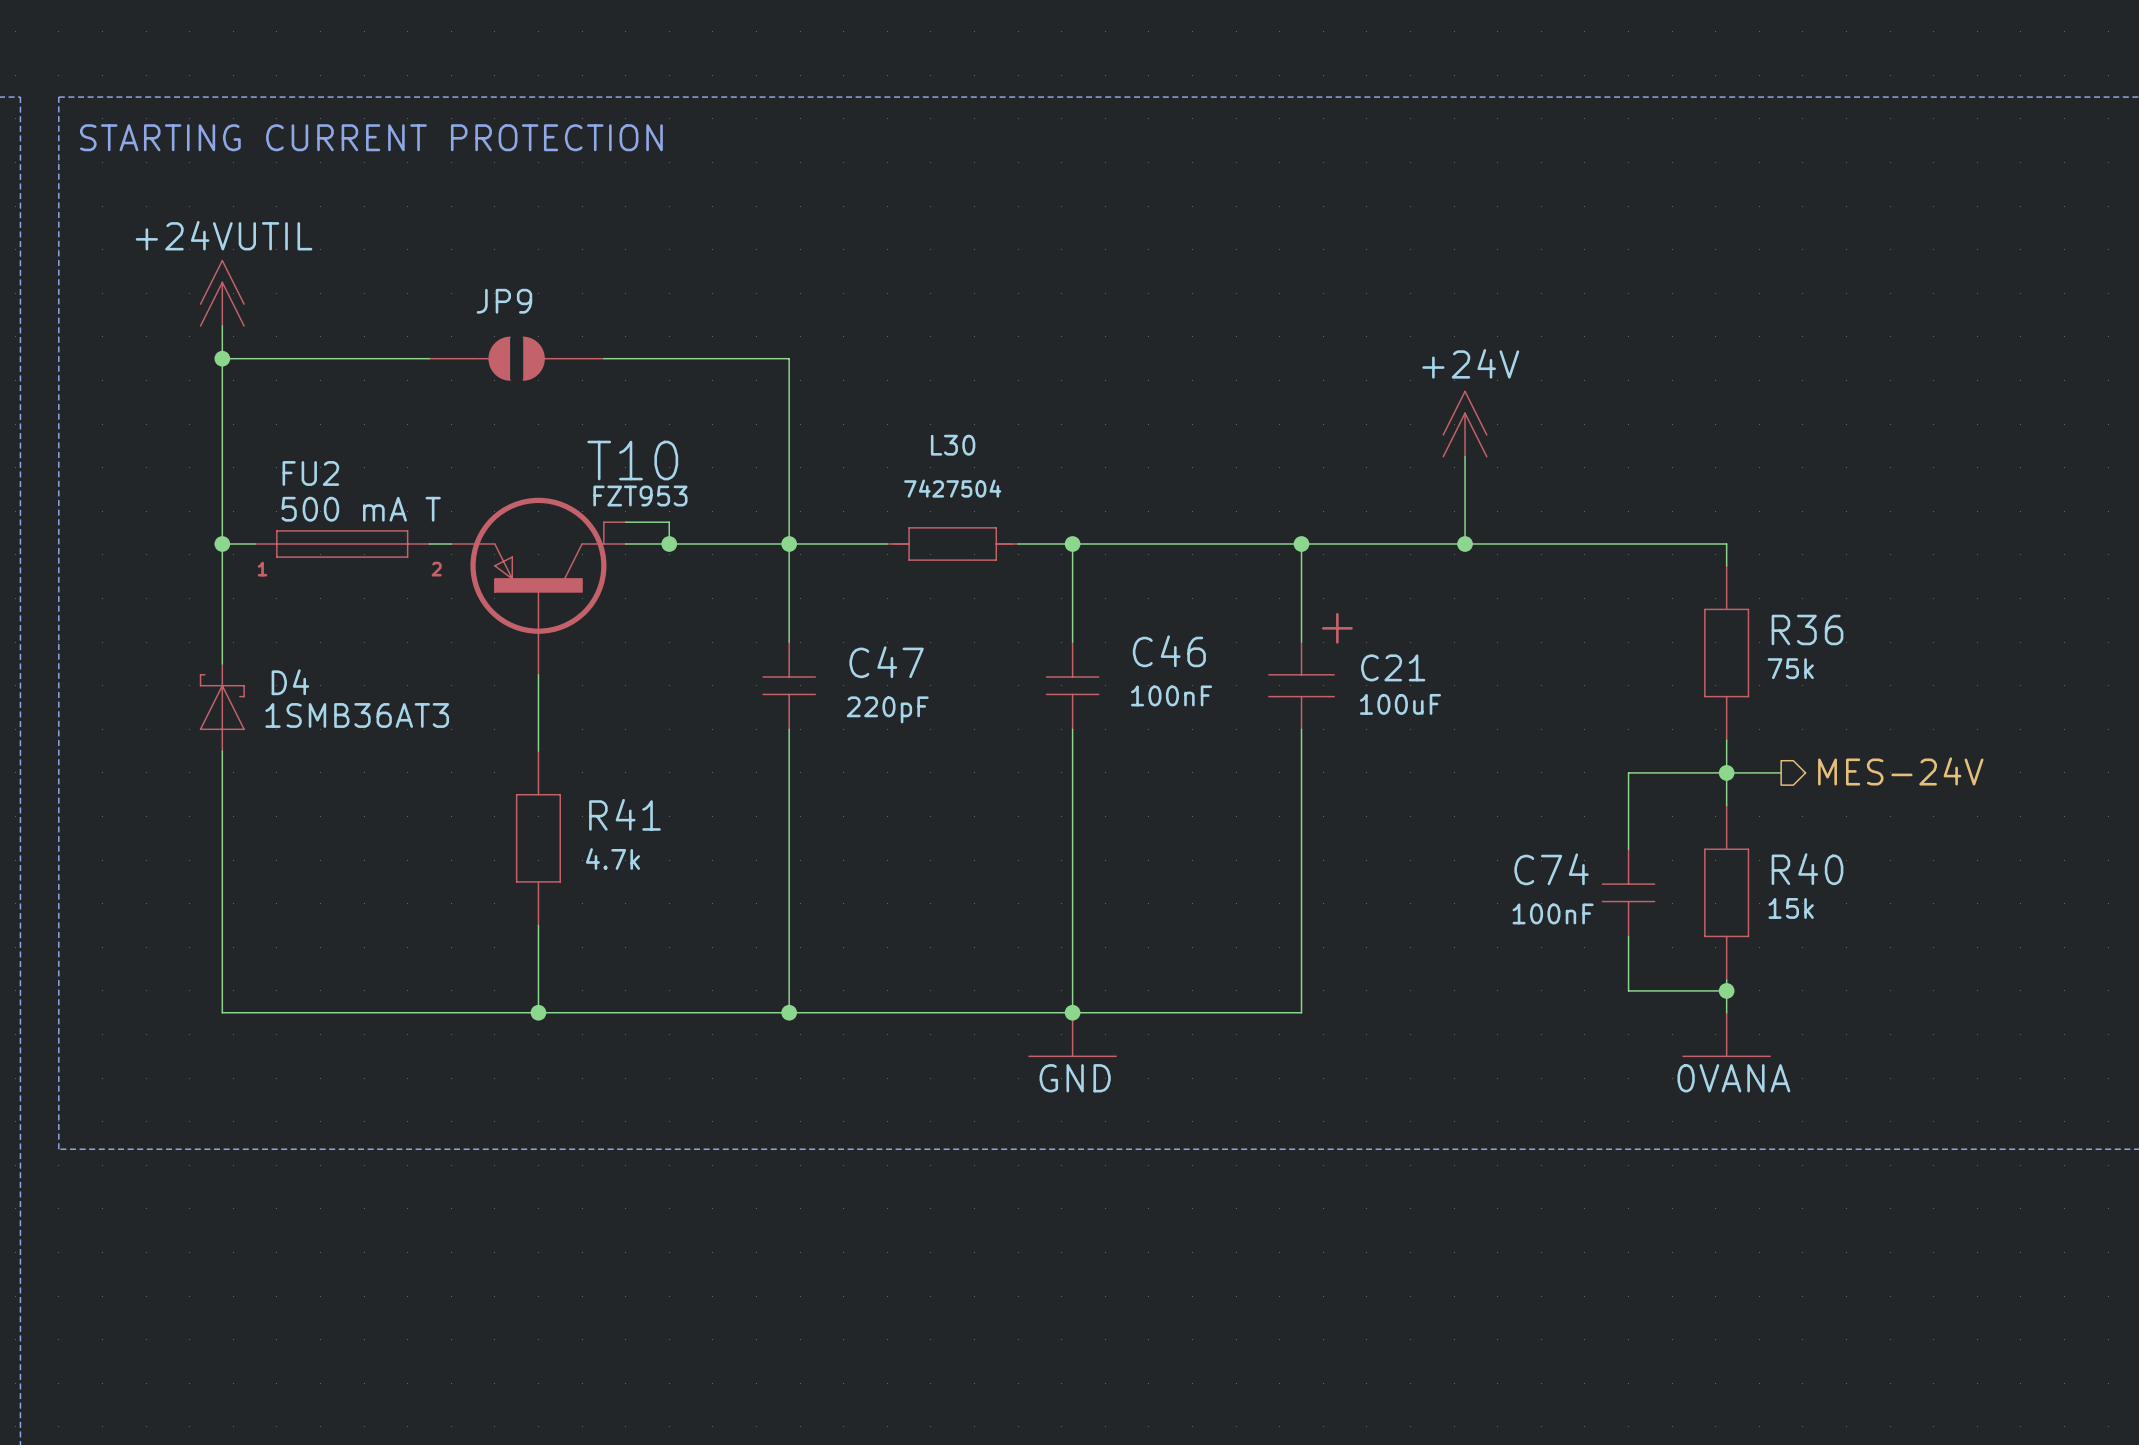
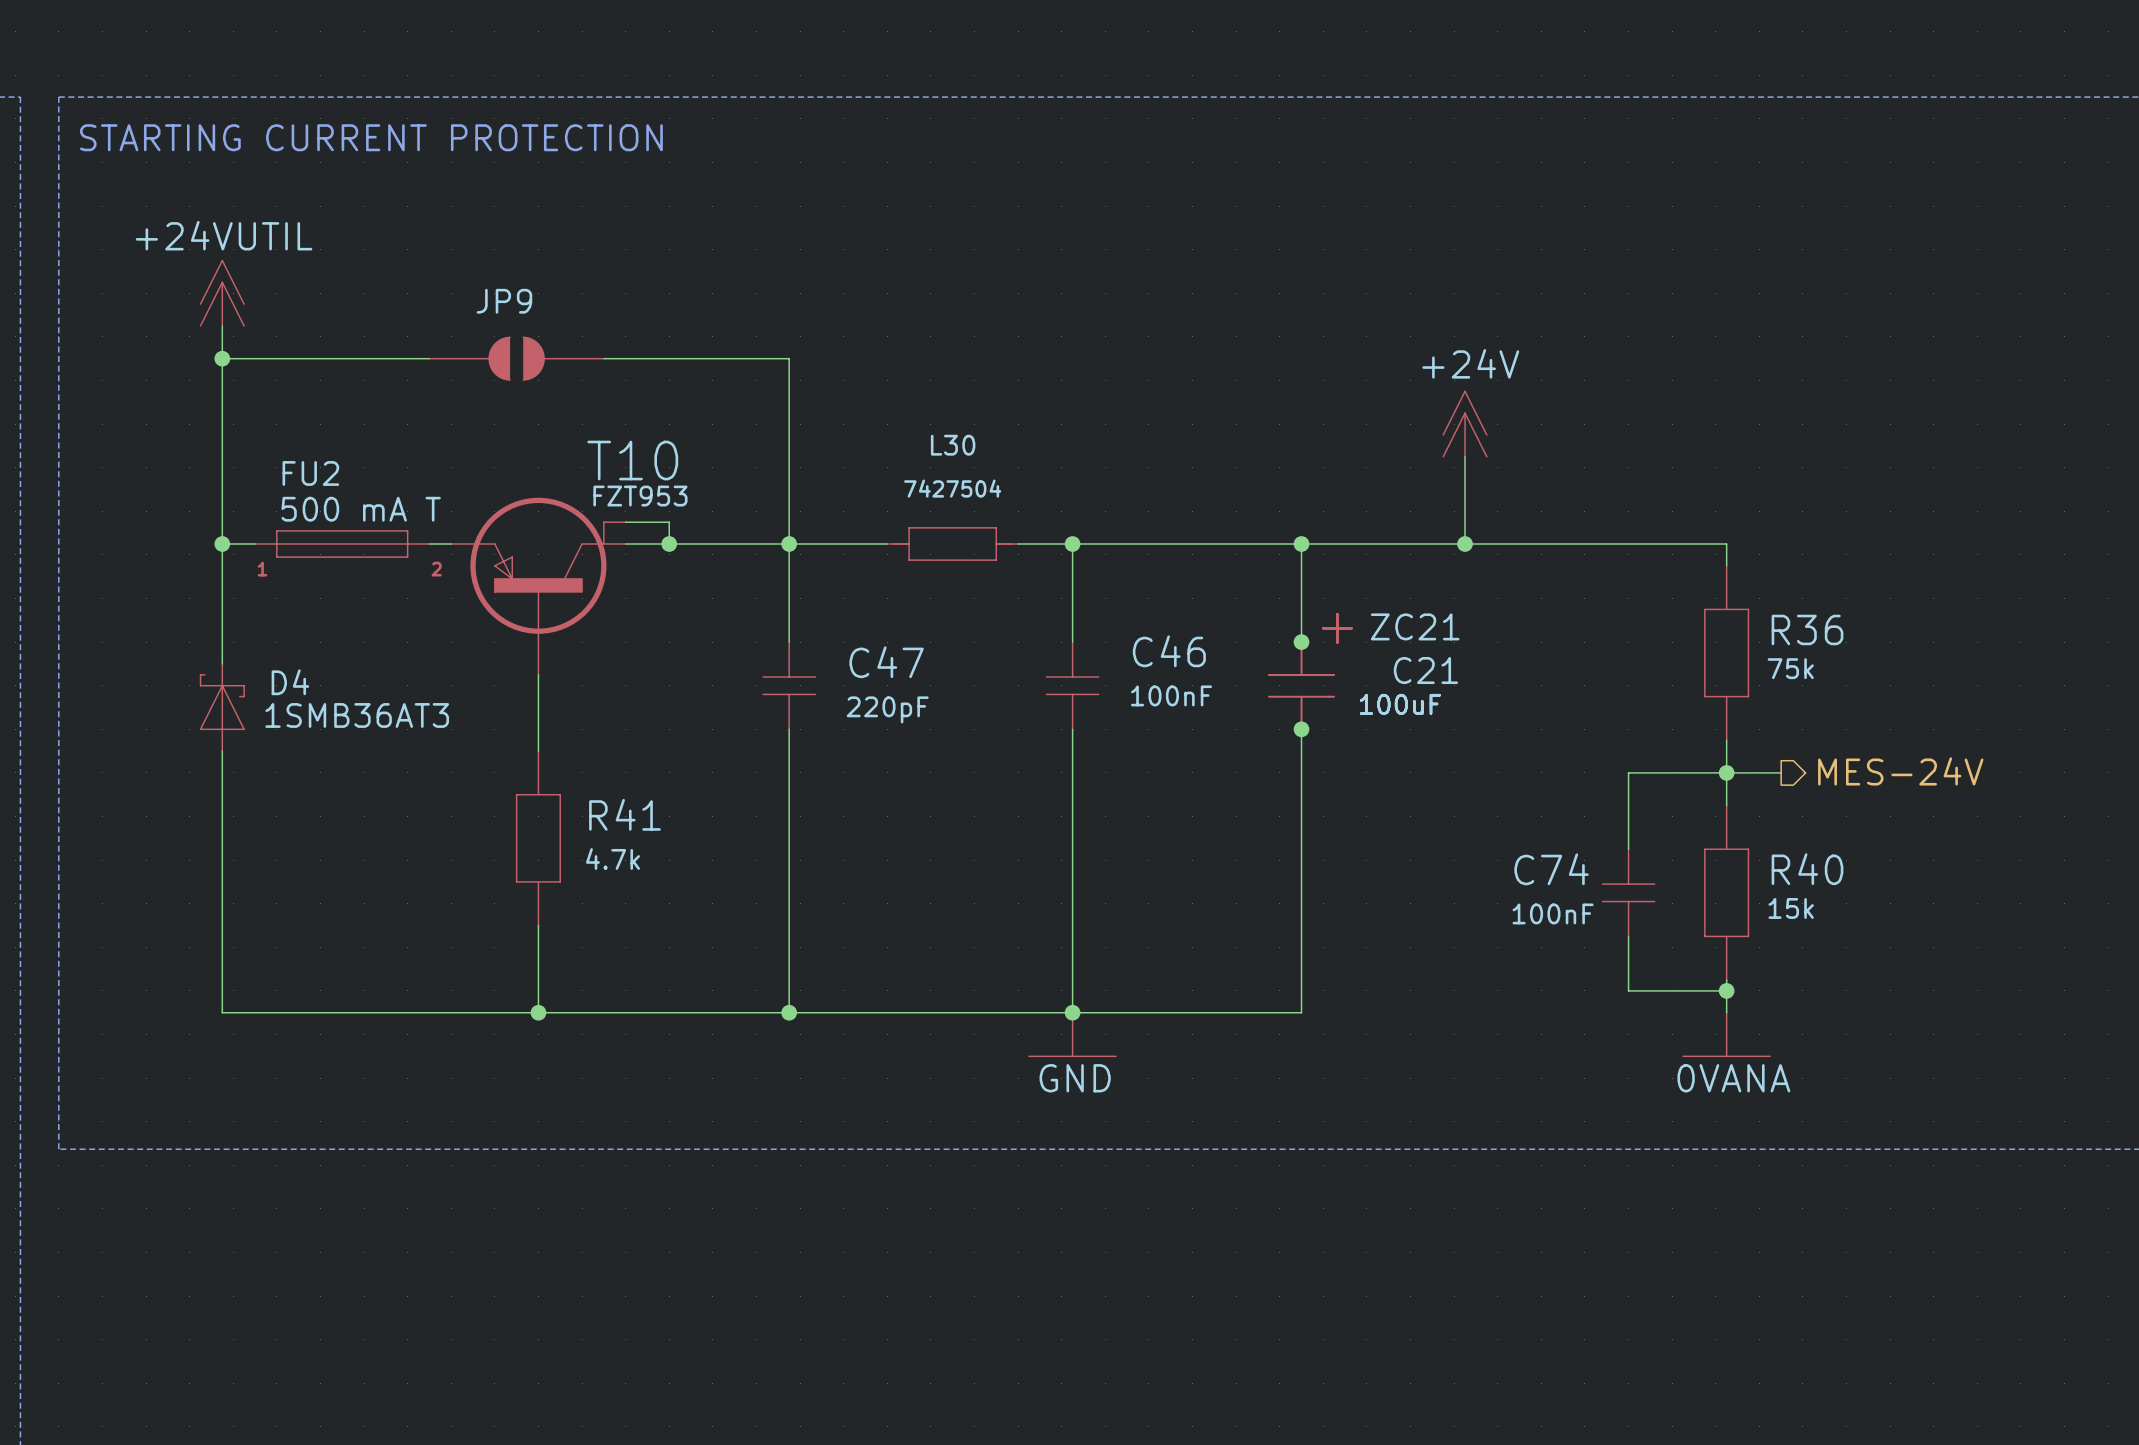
junction: none -> (1301, 642)
C21 name position: C21 (1393, 667) -> C21 (1425, 670)
ZC21: none -> 100uF (1301, 685)
junction: none -> (1301, 729)

